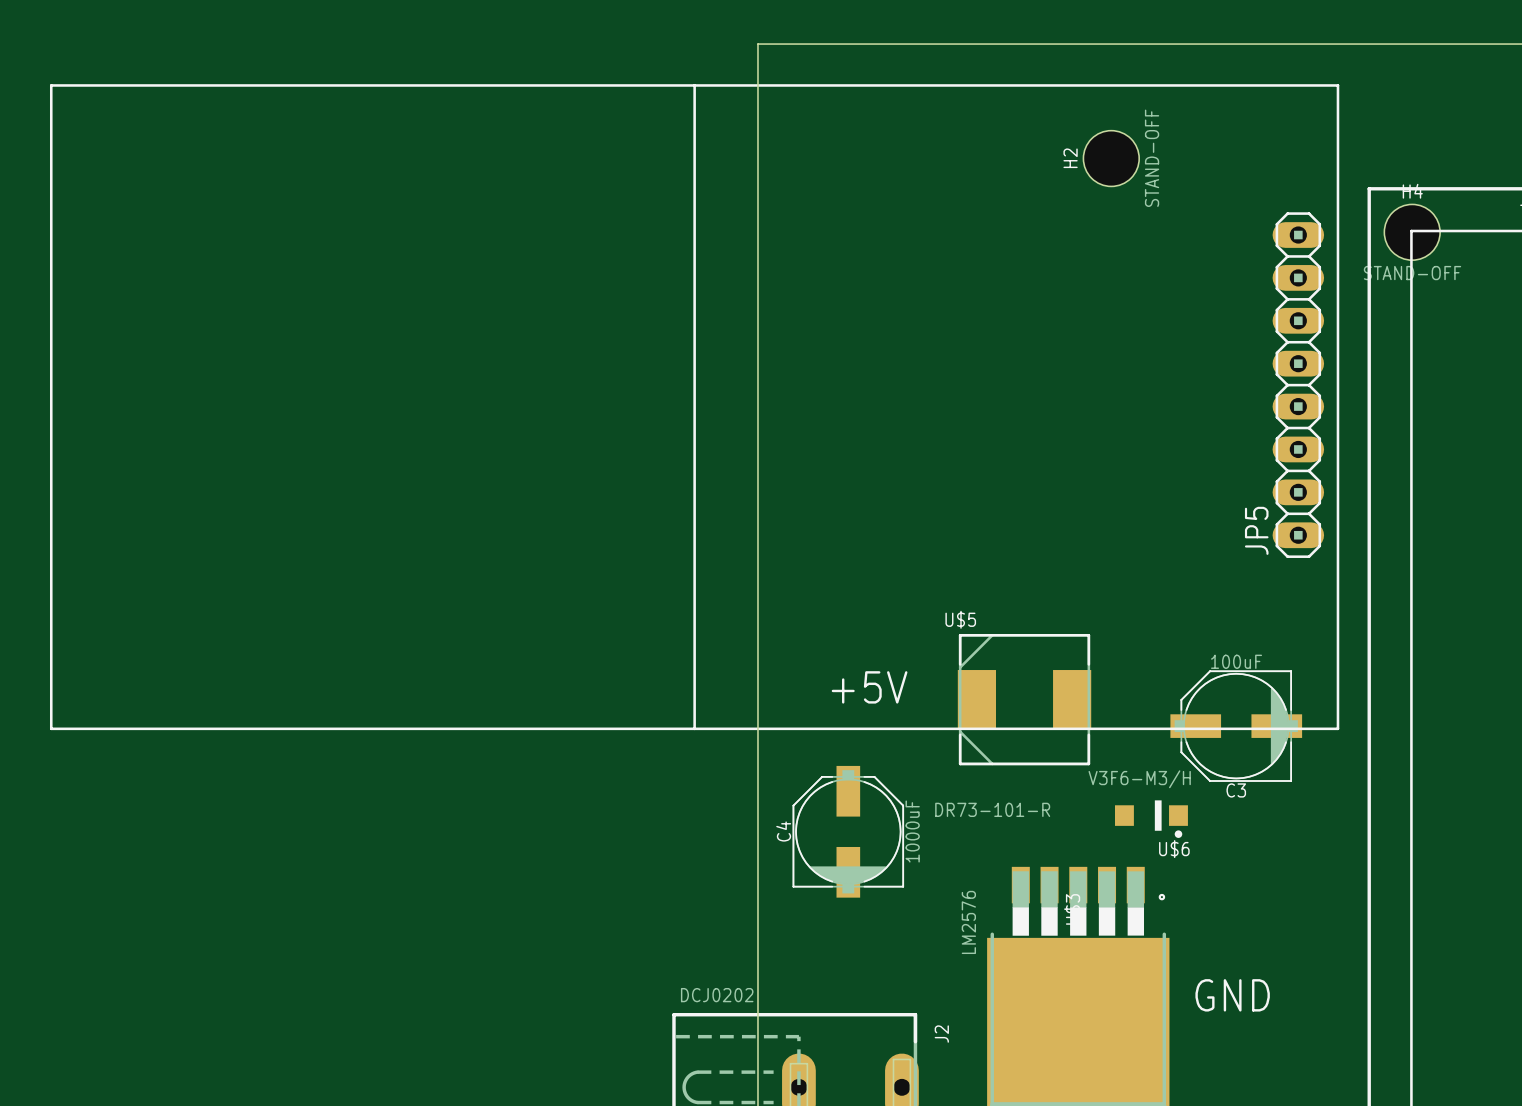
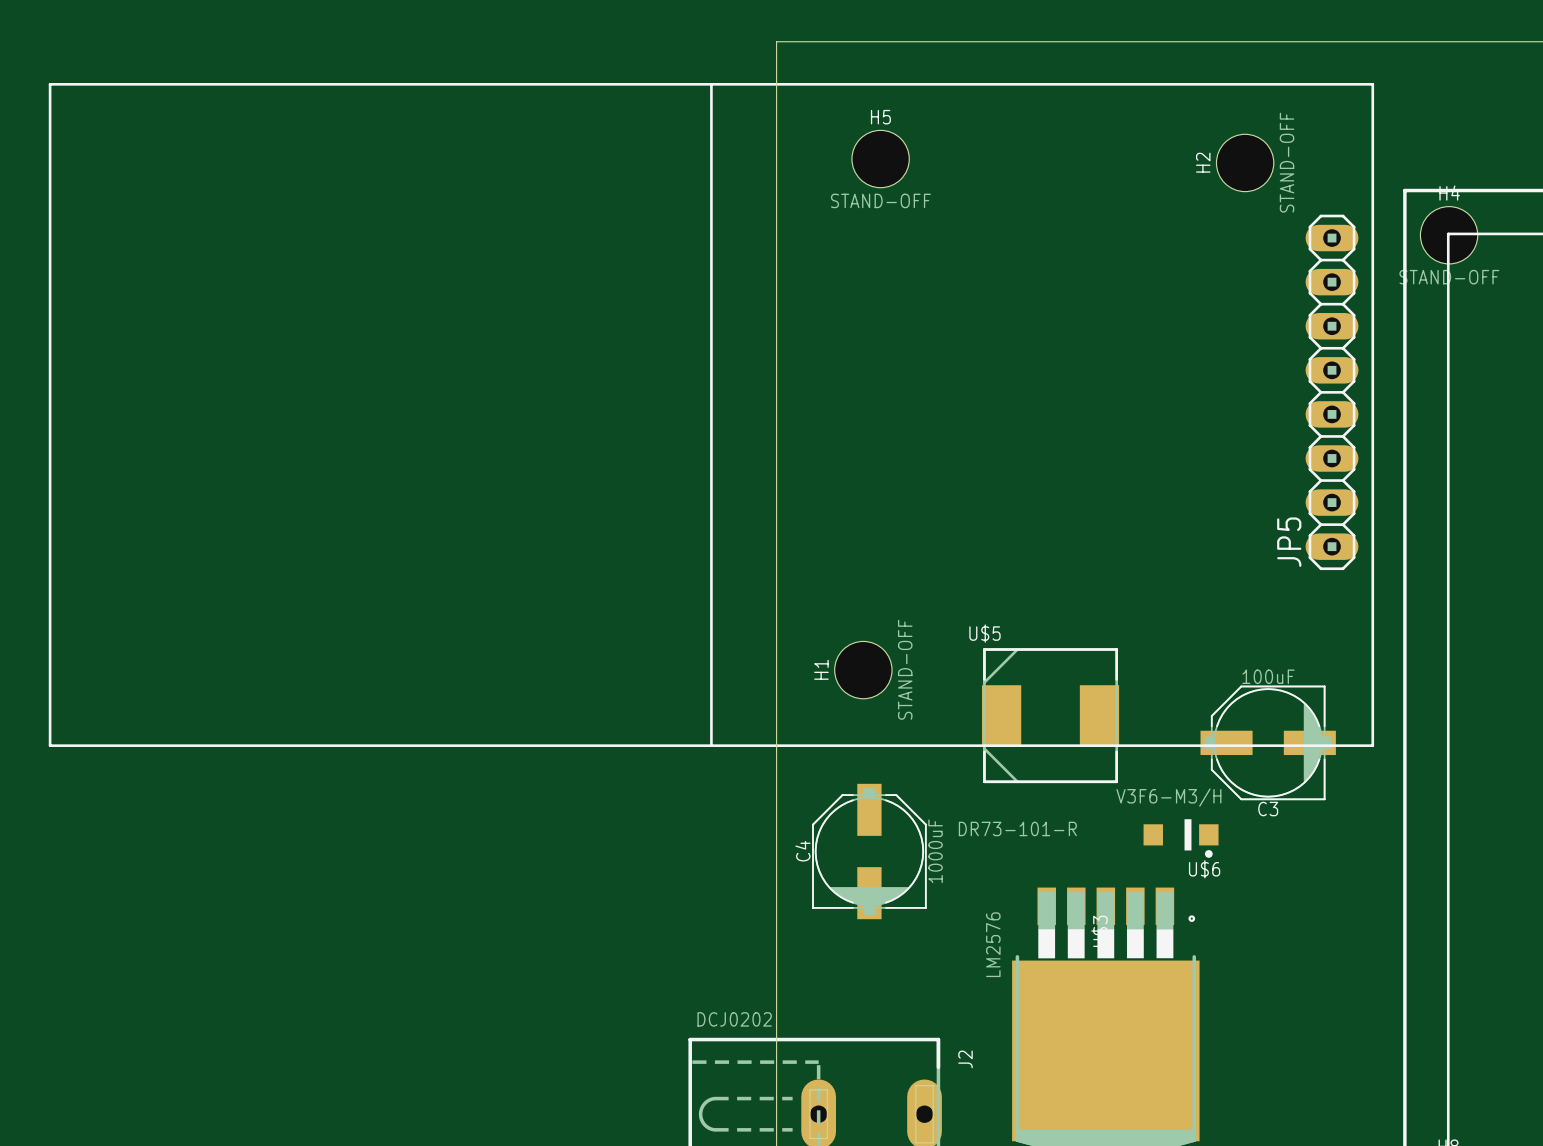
H5: none -> STAND-OFF (880, 159)
H2 position: (1111, 158) -> (1245, 162)
H1: none -> STAND-OFF (863, 670)
text: +5V (869, 687) -> none
text: GND (1232, 995) -> none

